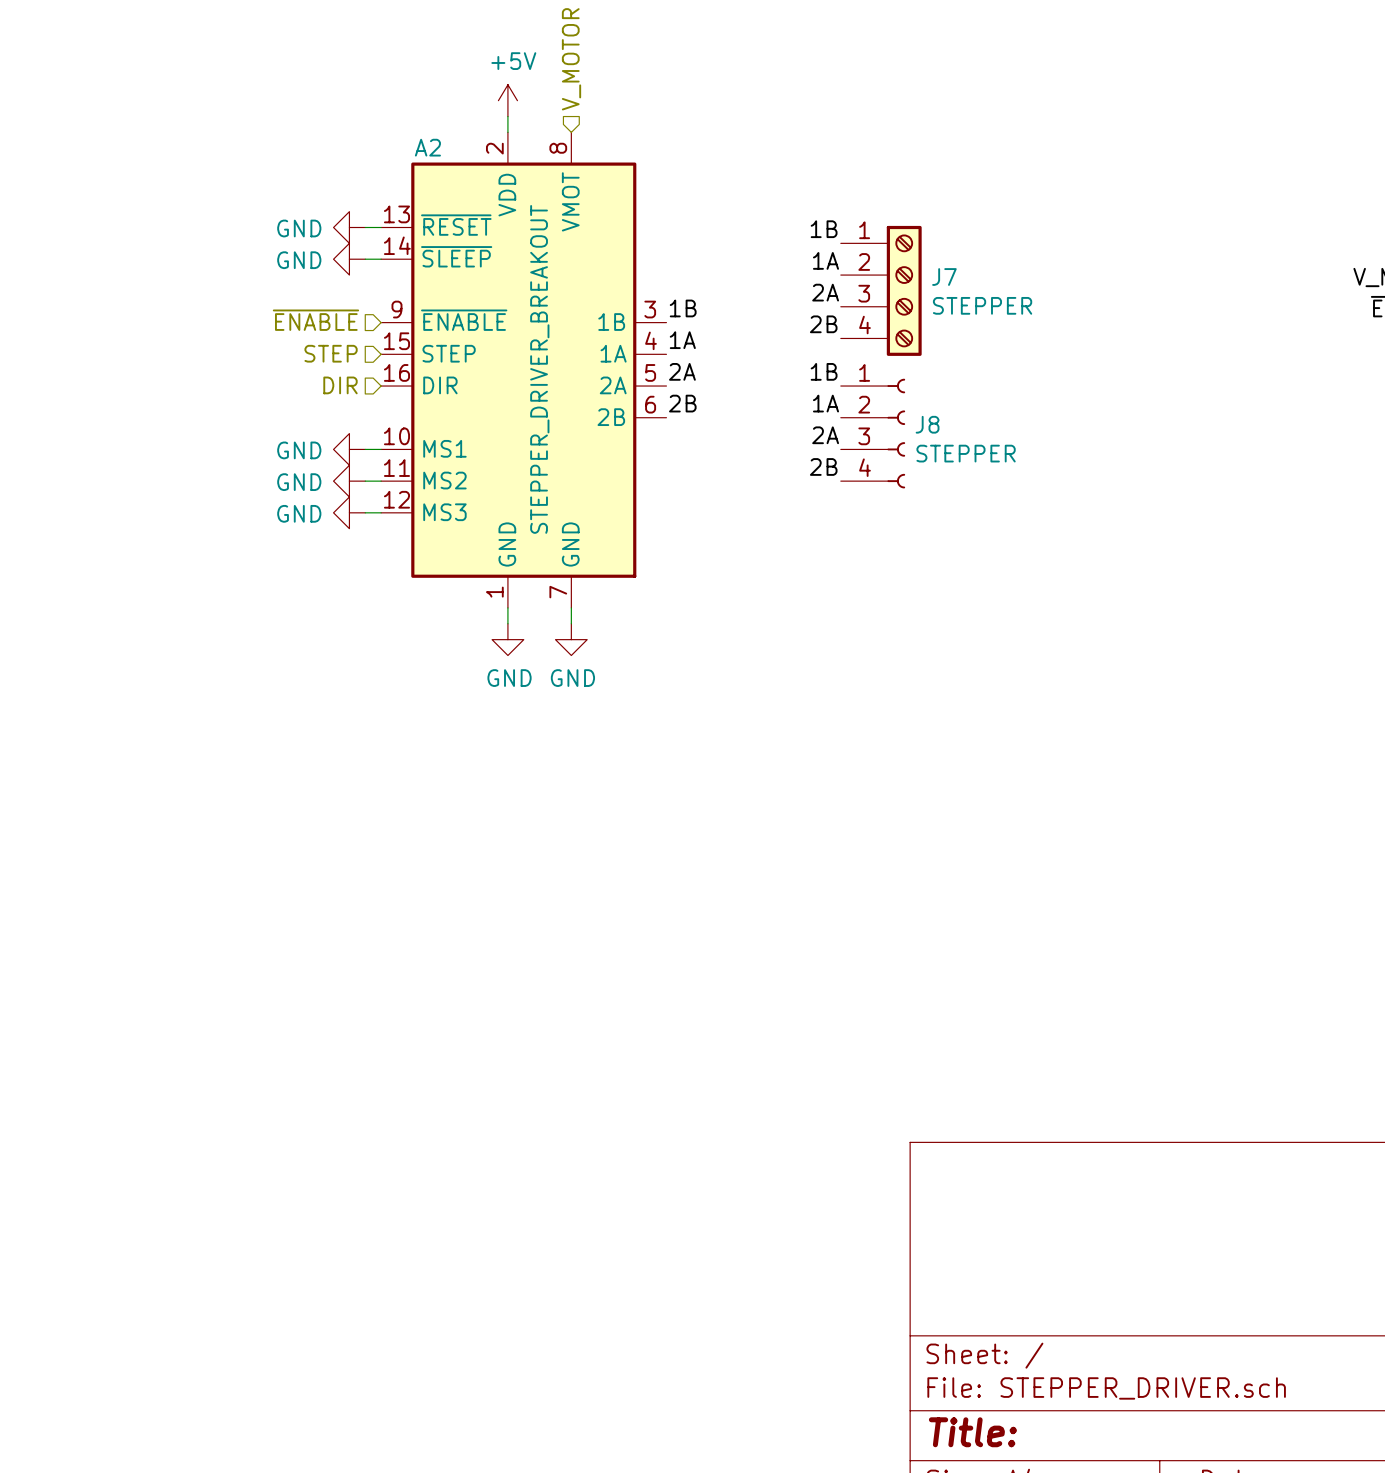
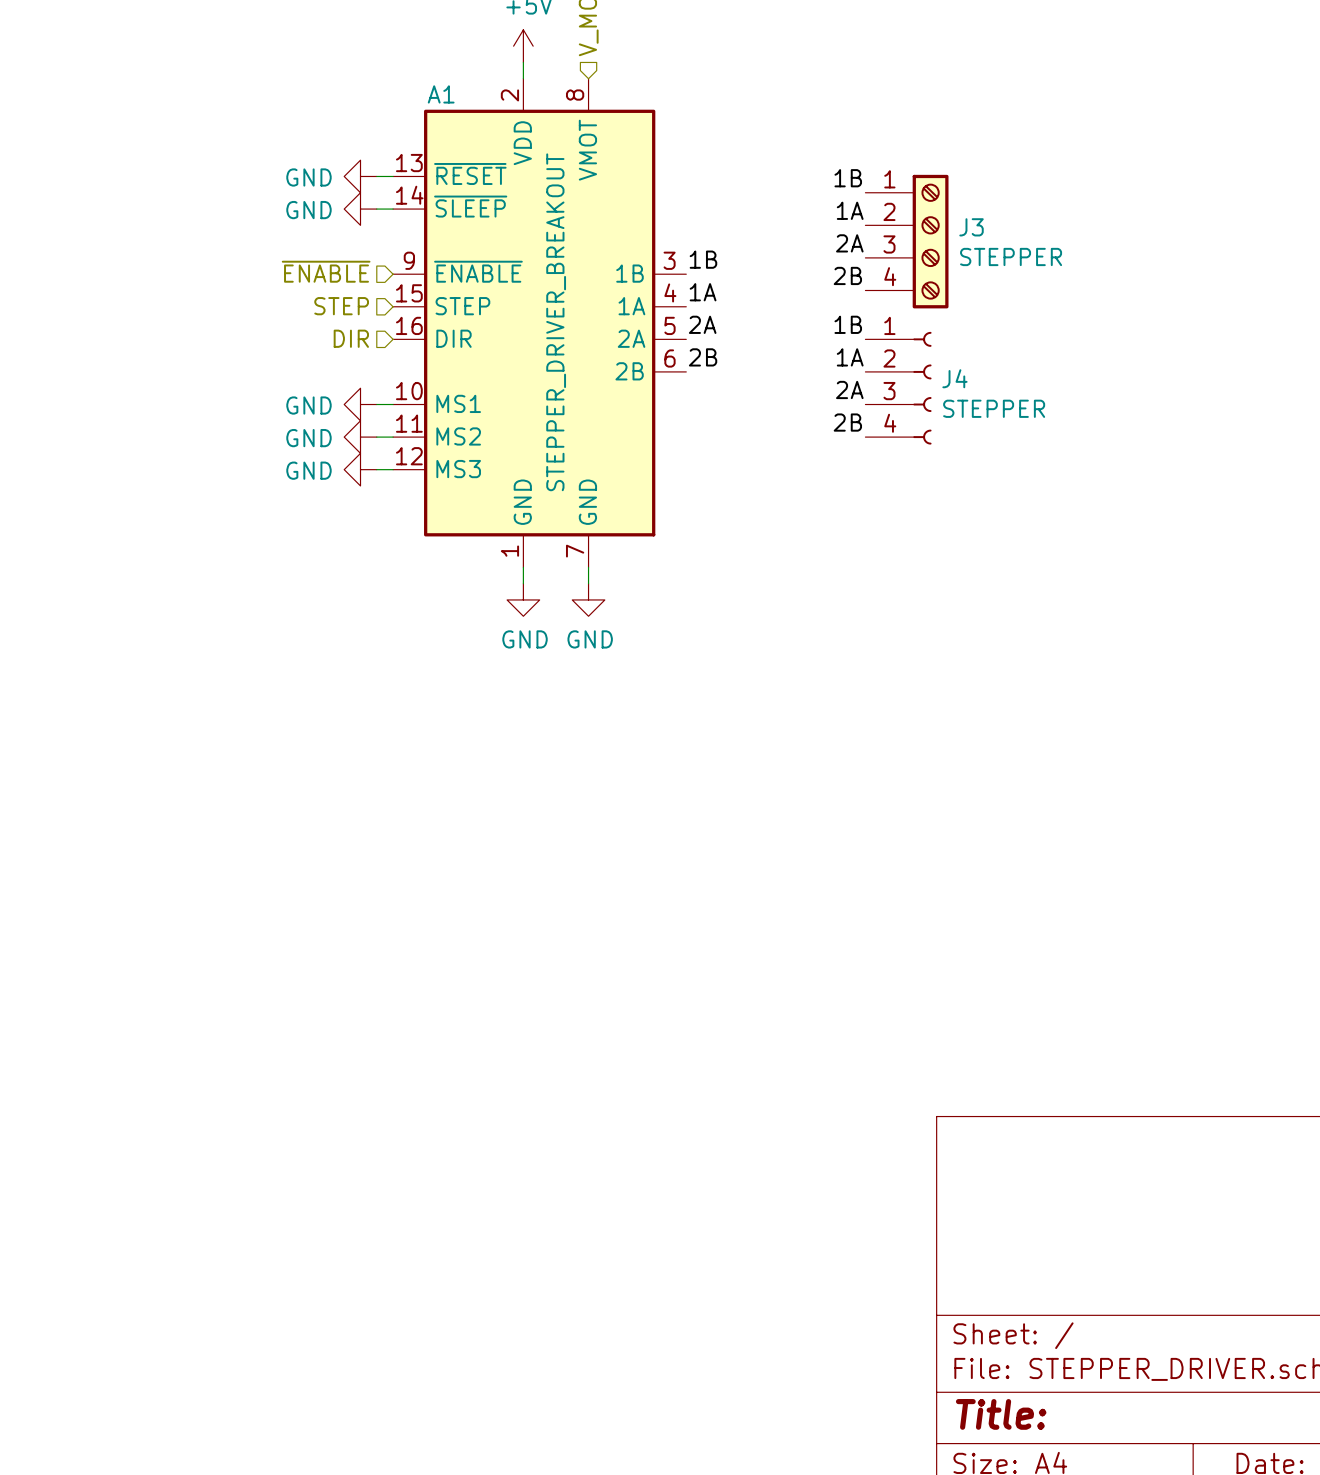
A2 name: A2 (427, 147) -> A1 (441, 94)
J7 name: J7 (944, 277) -> J3 (971, 227)
J8 name: J8 (927, 424) -> J4 (954, 378)

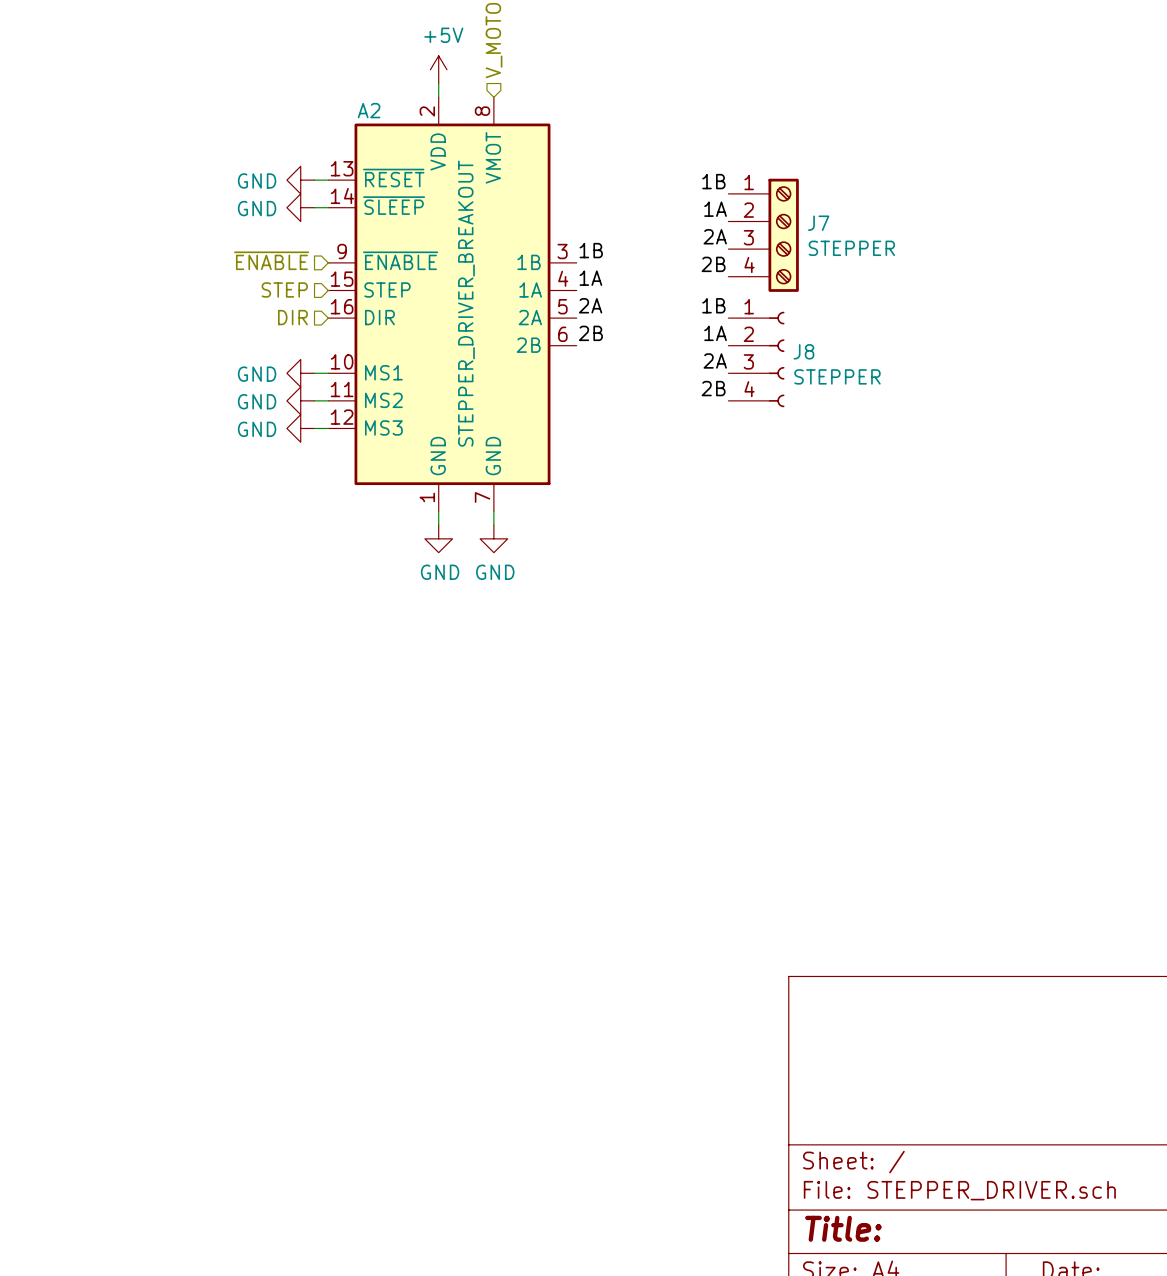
A1 name: A1 (441, 94) -> A2 (369, 110)
J3 name: J3 (971, 227) -> J7 (818, 223)
J4 name: J4 (954, 378) -> J8 (803, 351)

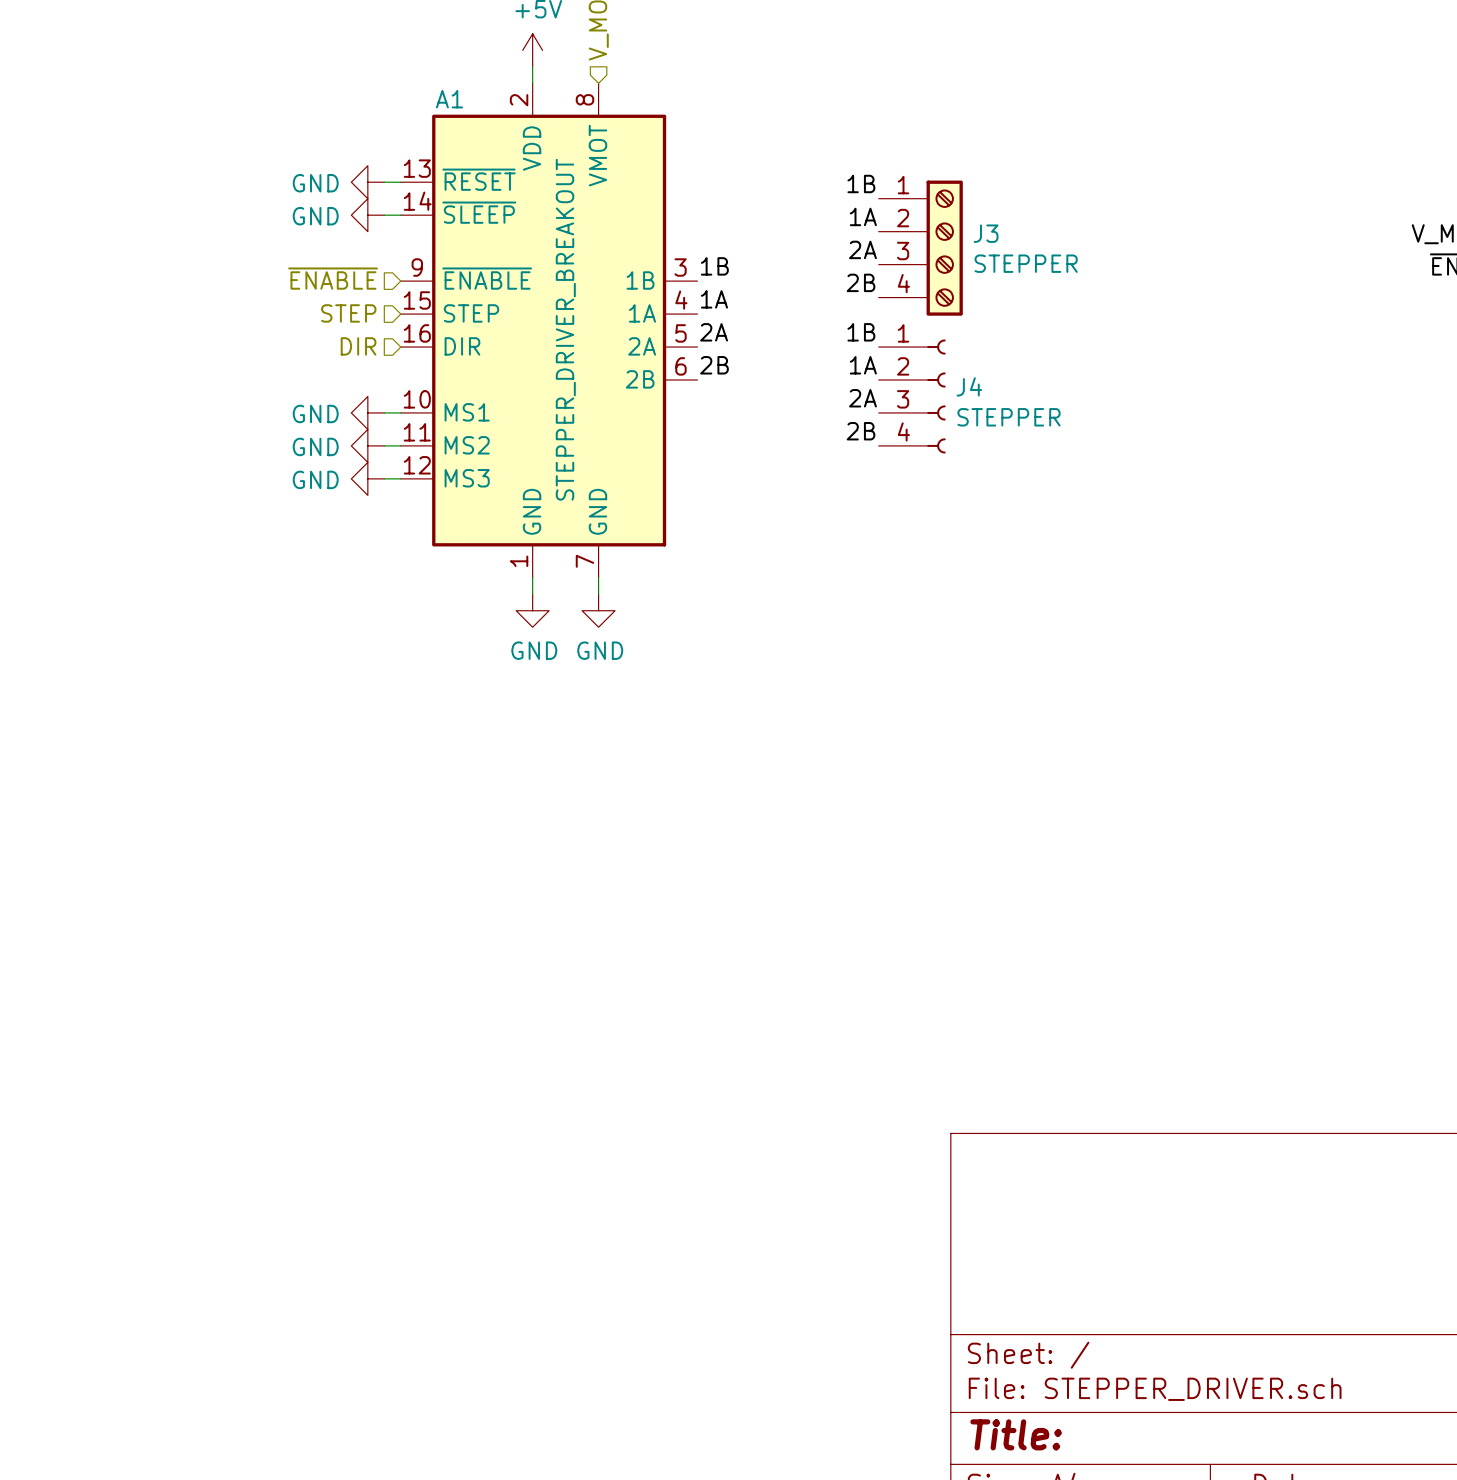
A2 name: A2 (369, 110) -> A1 (449, 99)
J7 name: J7 (818, 223) -> J3 (986, 233)
J8 name: J8 (803, 351) -> J4 (969, 386)

